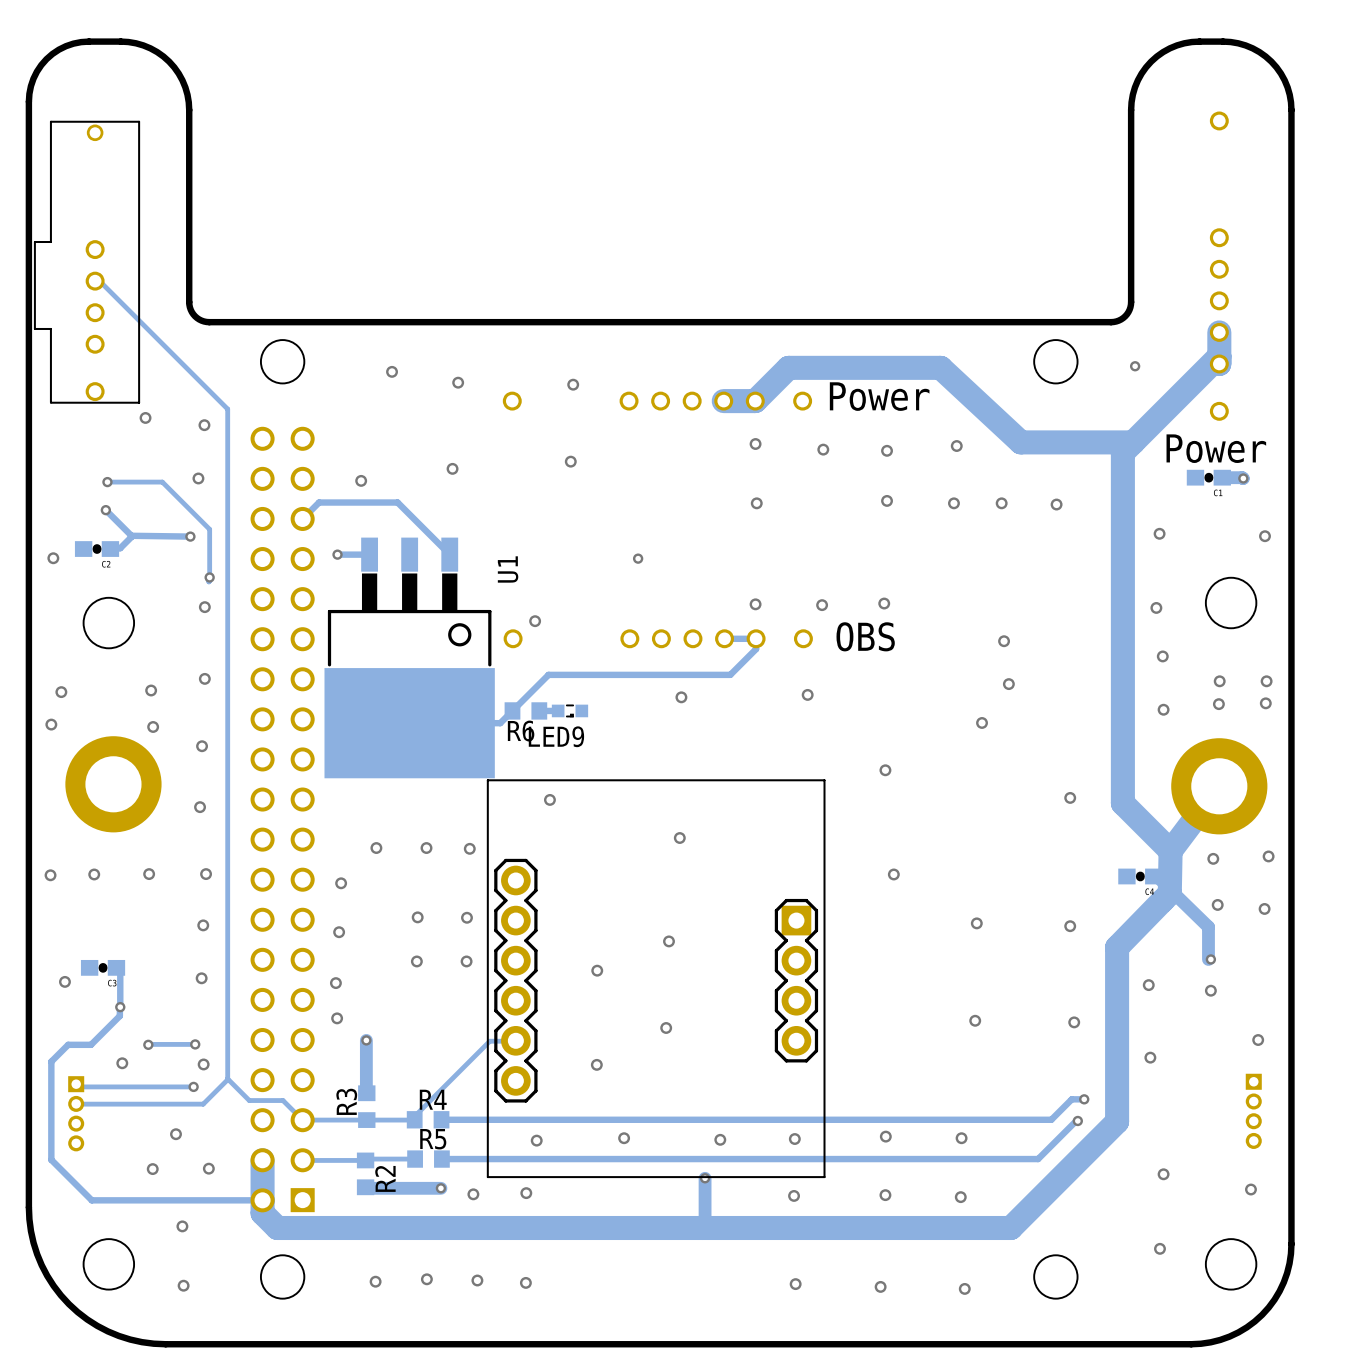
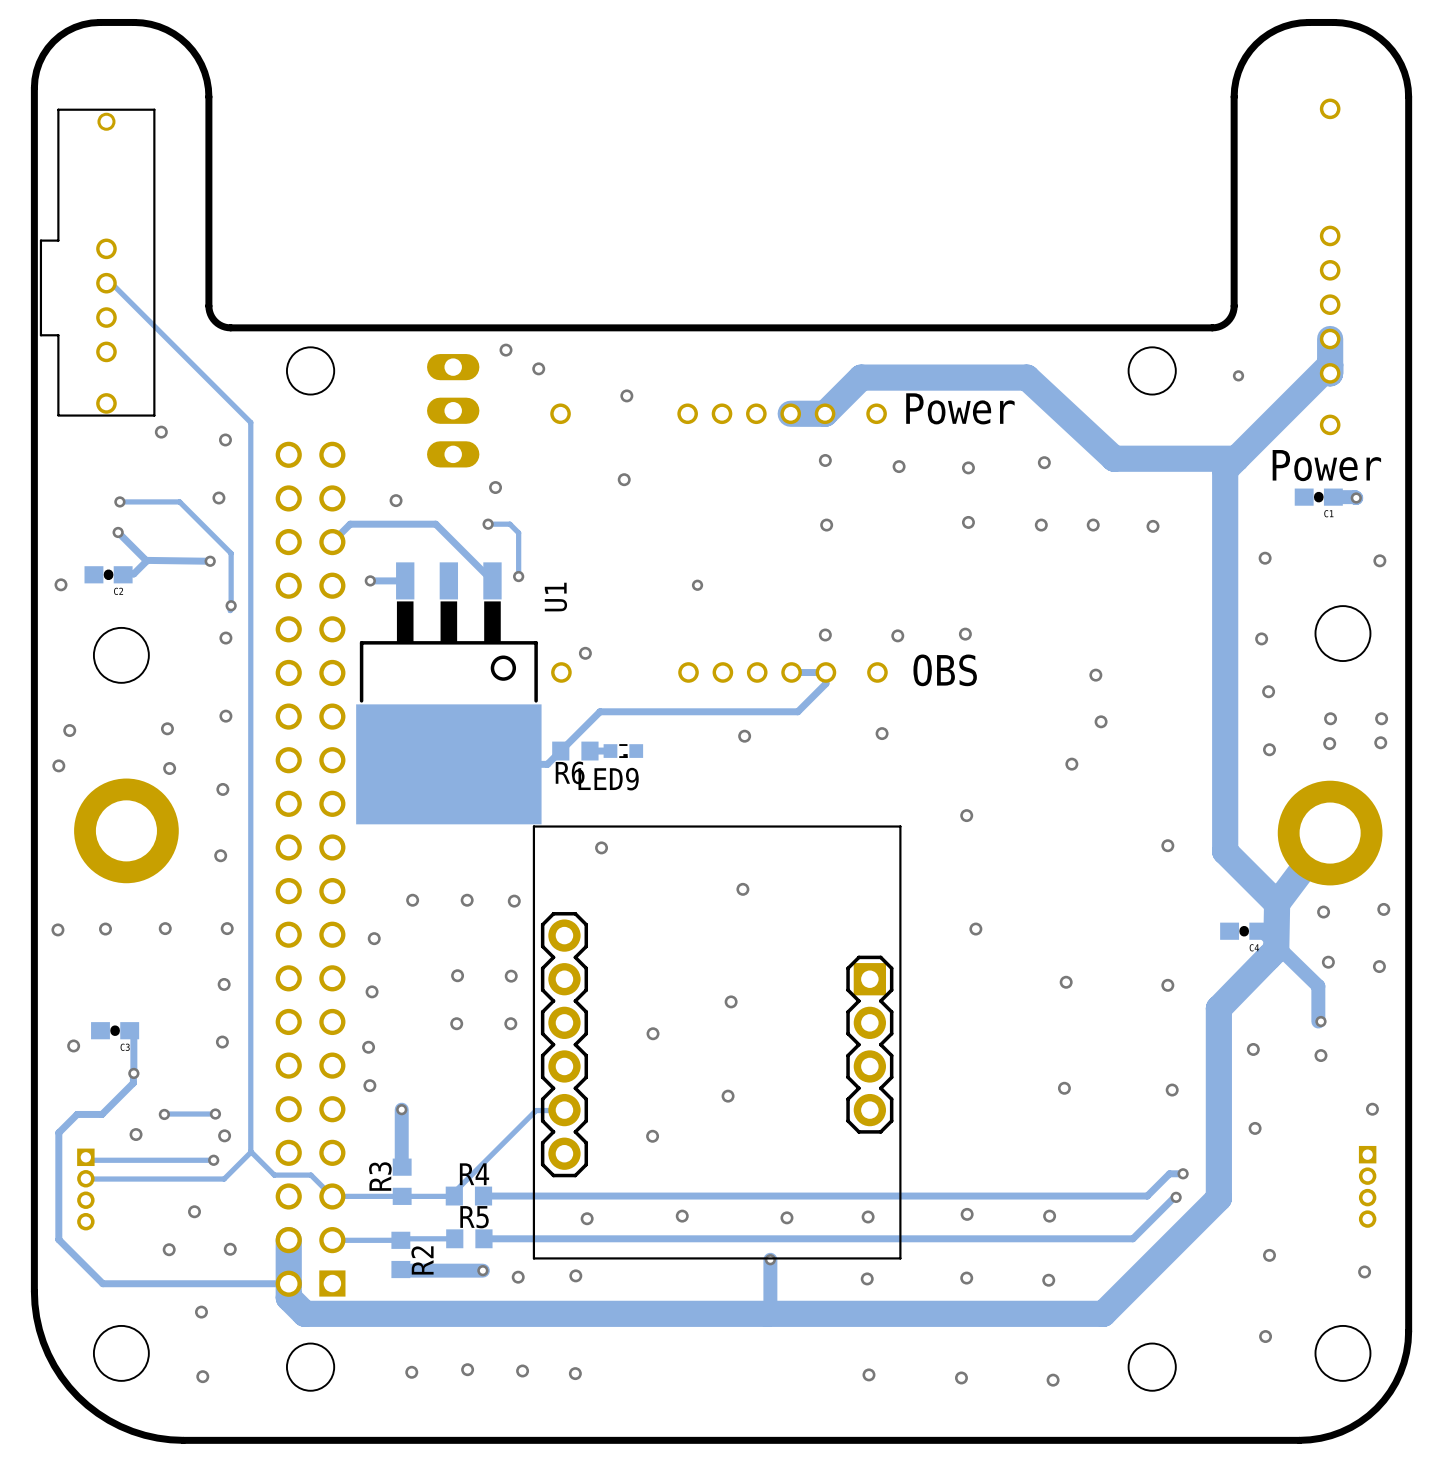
via: none -> (506, 350)
via: none -> (538, 368)
via: (392, 371) -> none
via: (458, 382) -> none
part: none -> (453, 410)
track: none -> (488, 524) (509, 524) (518, 532) (518, 576)
via: none -> (488, 524)
via: none -> (518, 576)

